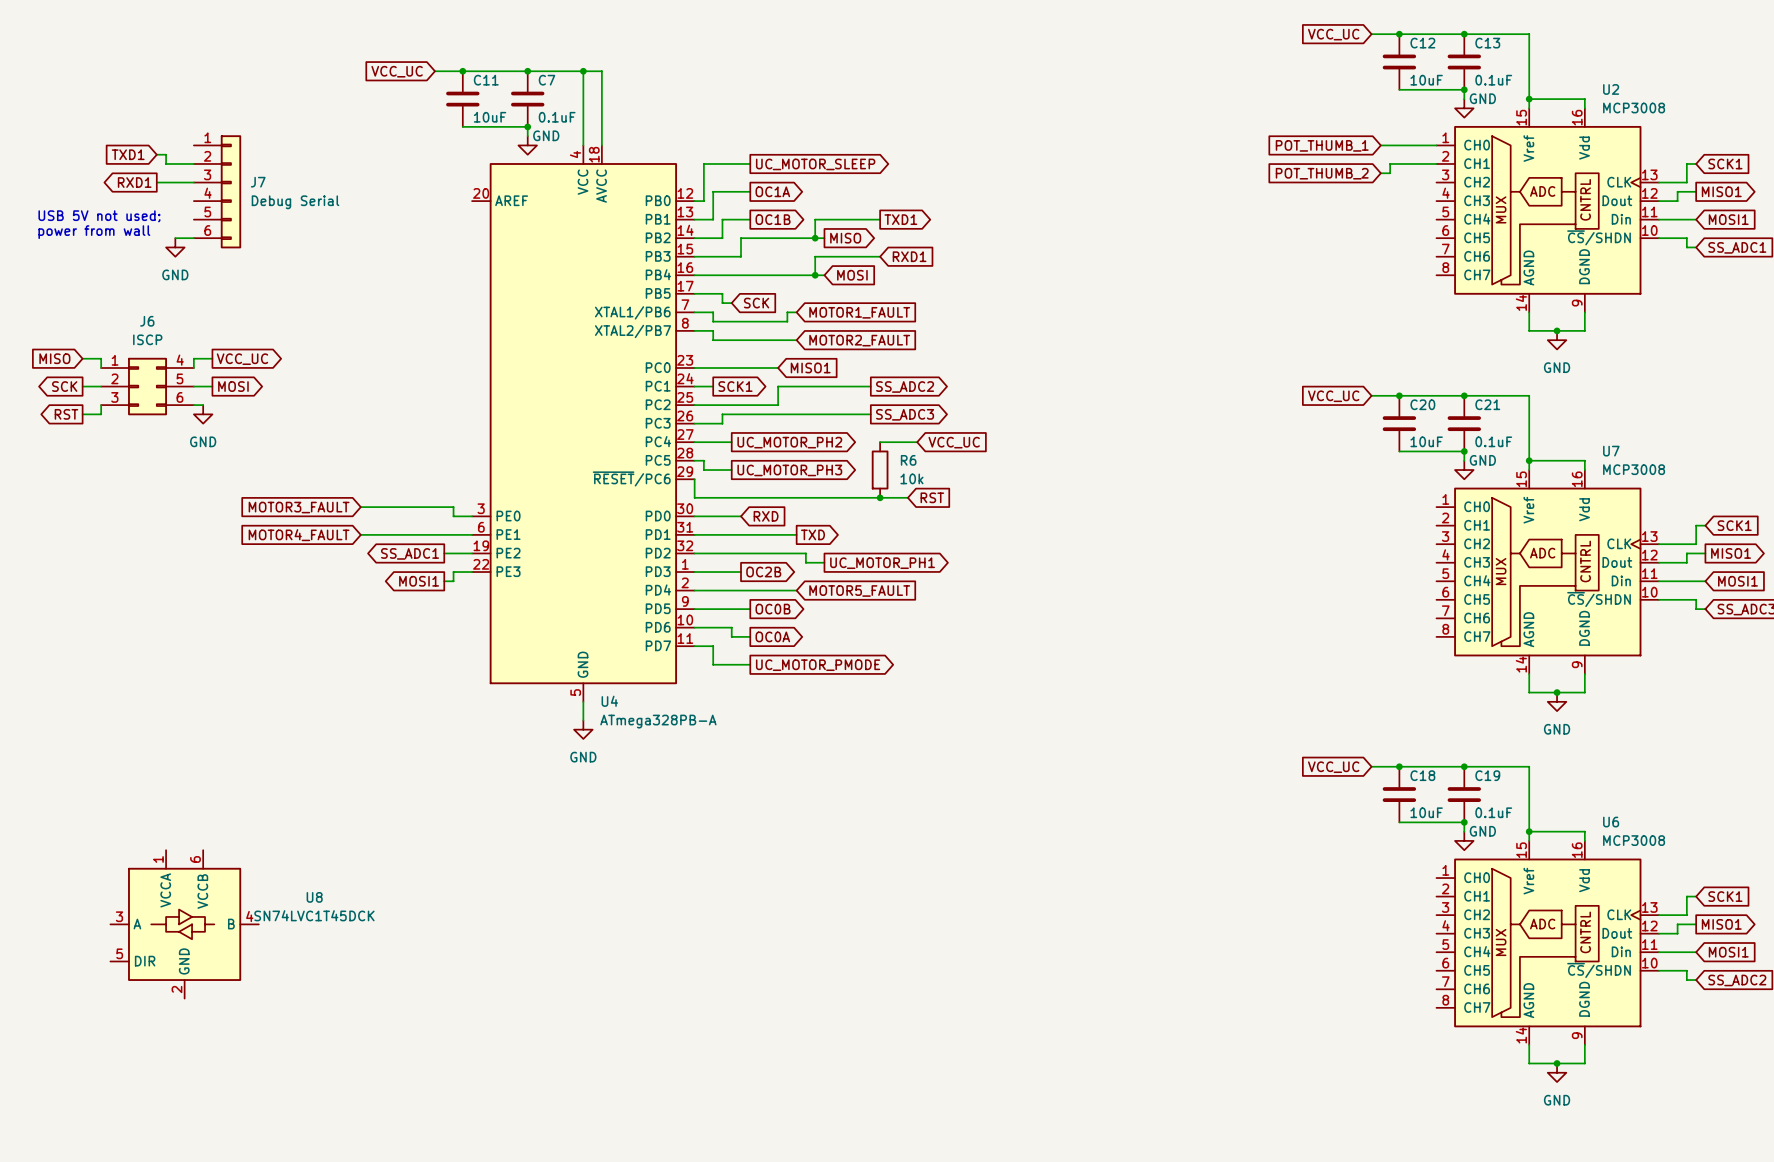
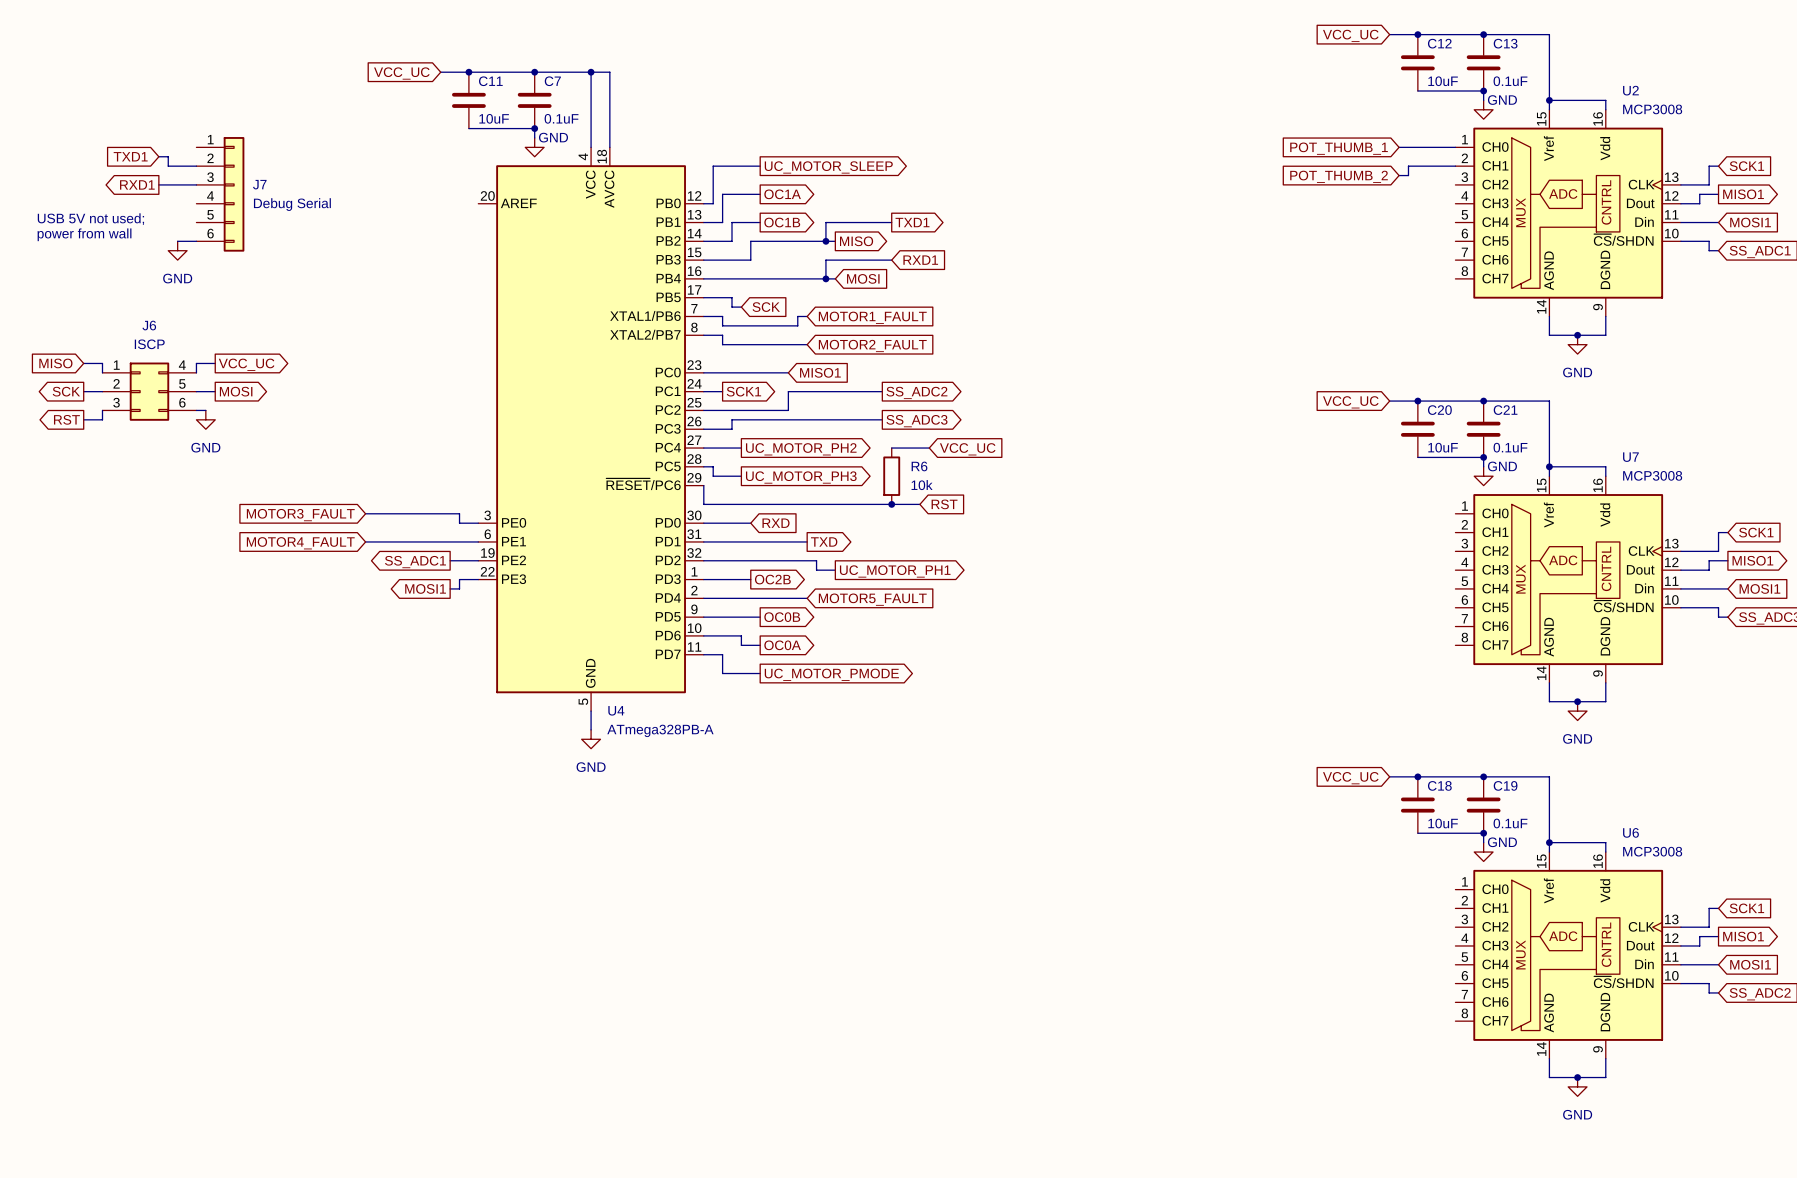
U8: SN74LVC1T45DCK (184, 924) -> none

